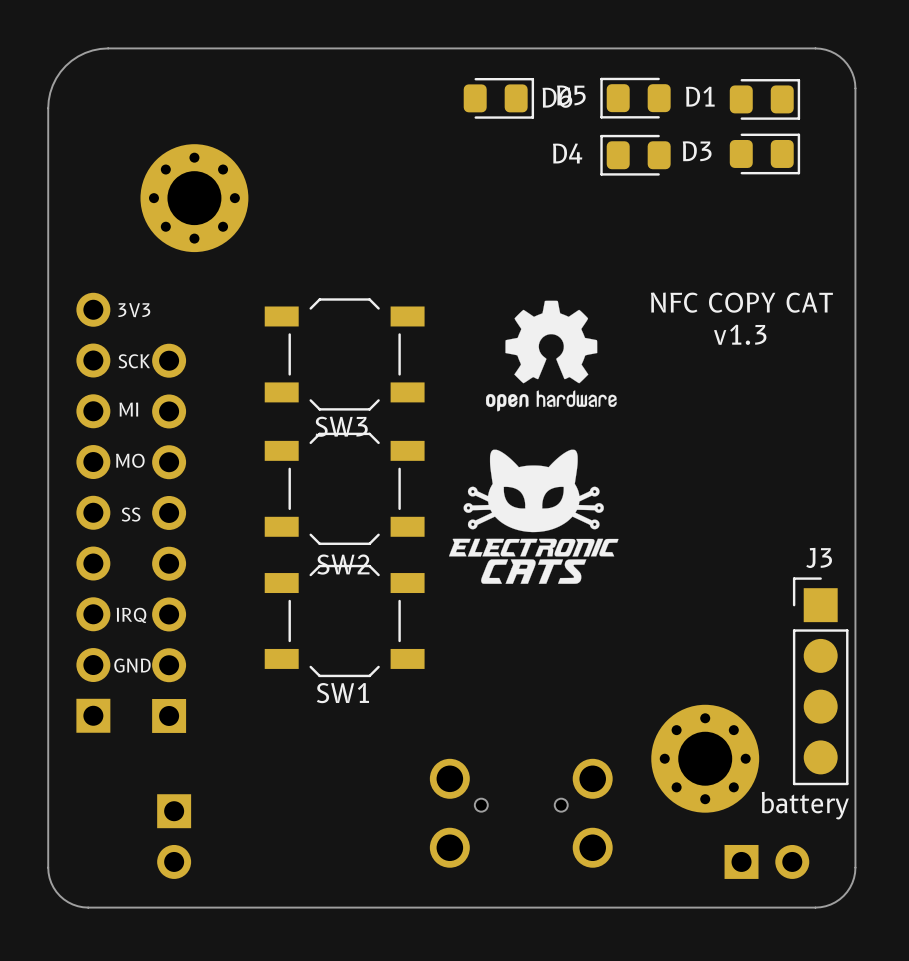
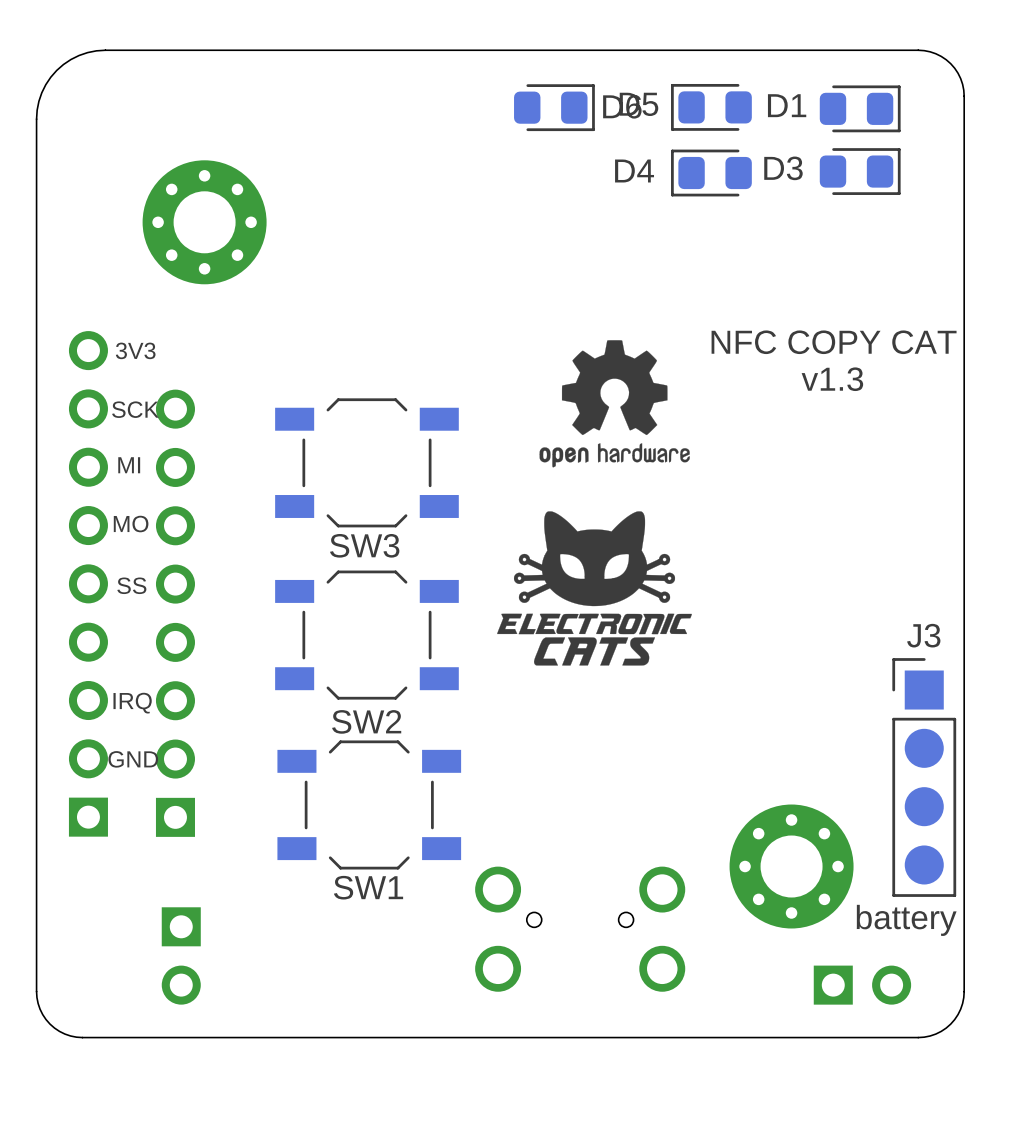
SW3 position: (344, 354) -> (366, 462)
SW2 position: (344, 488) -> (366, 635)
SW1 position: (344, 620) -> (369, 804)

